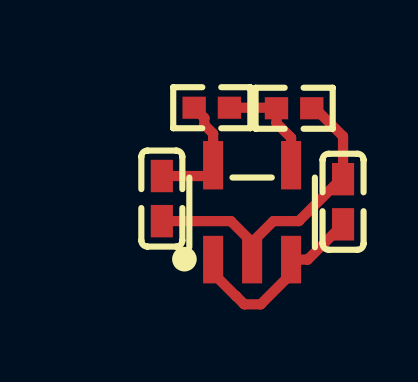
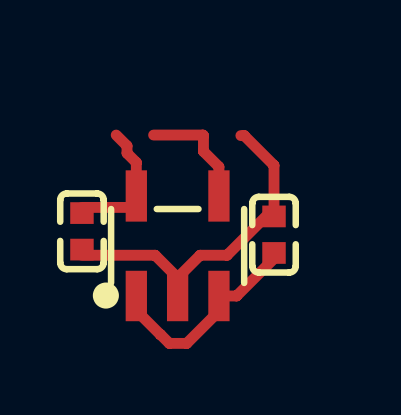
part: (211, 107) -> none
part: (294, 108) -> none
part footprint: [138, 147, 186, 250] -> [56, 190, 107, 273]
part footprint: [319, 150, 367, 253] -> [249, 193, 300, 276]

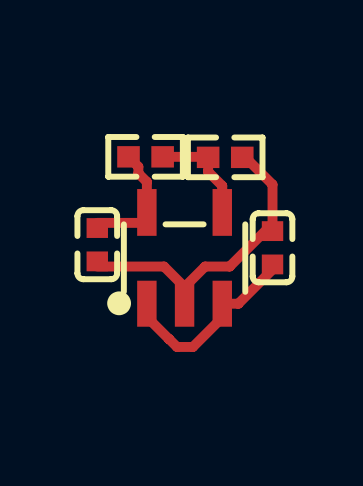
part: none -> (145, 156)
part: none -> (225, 157)

